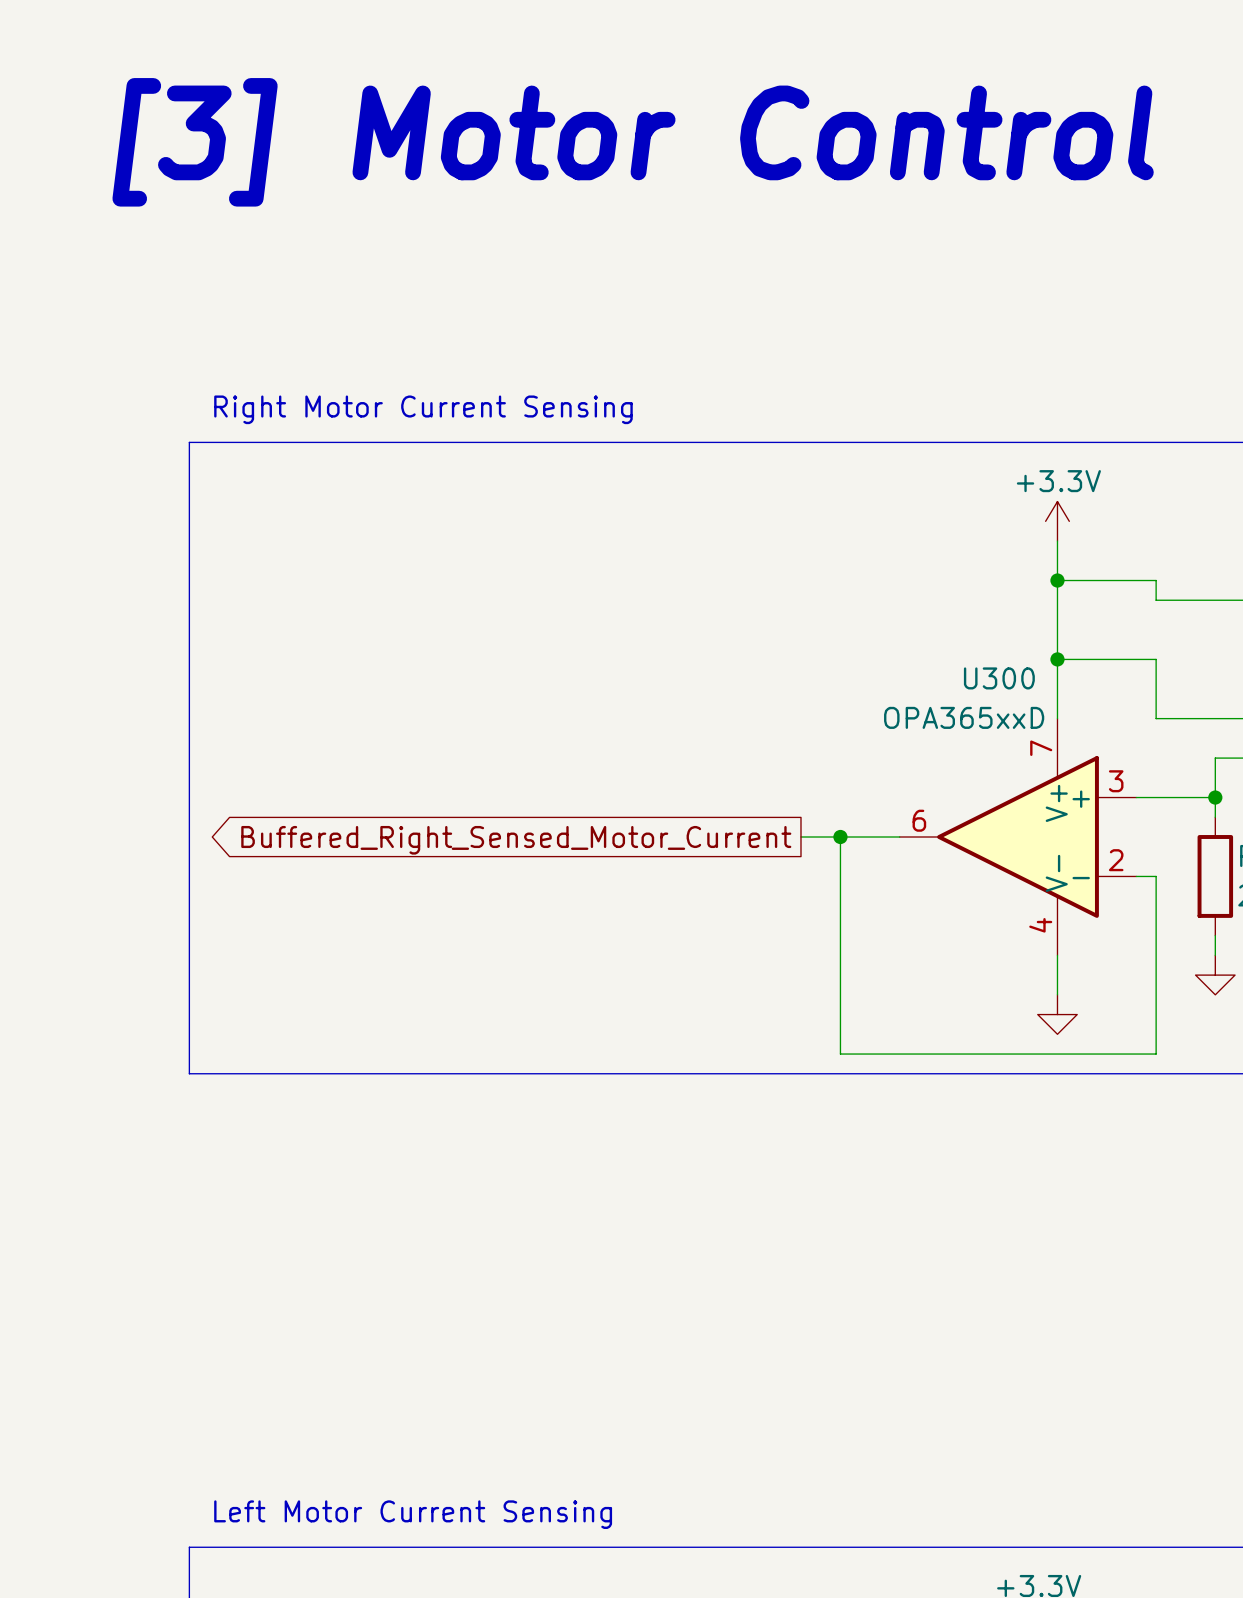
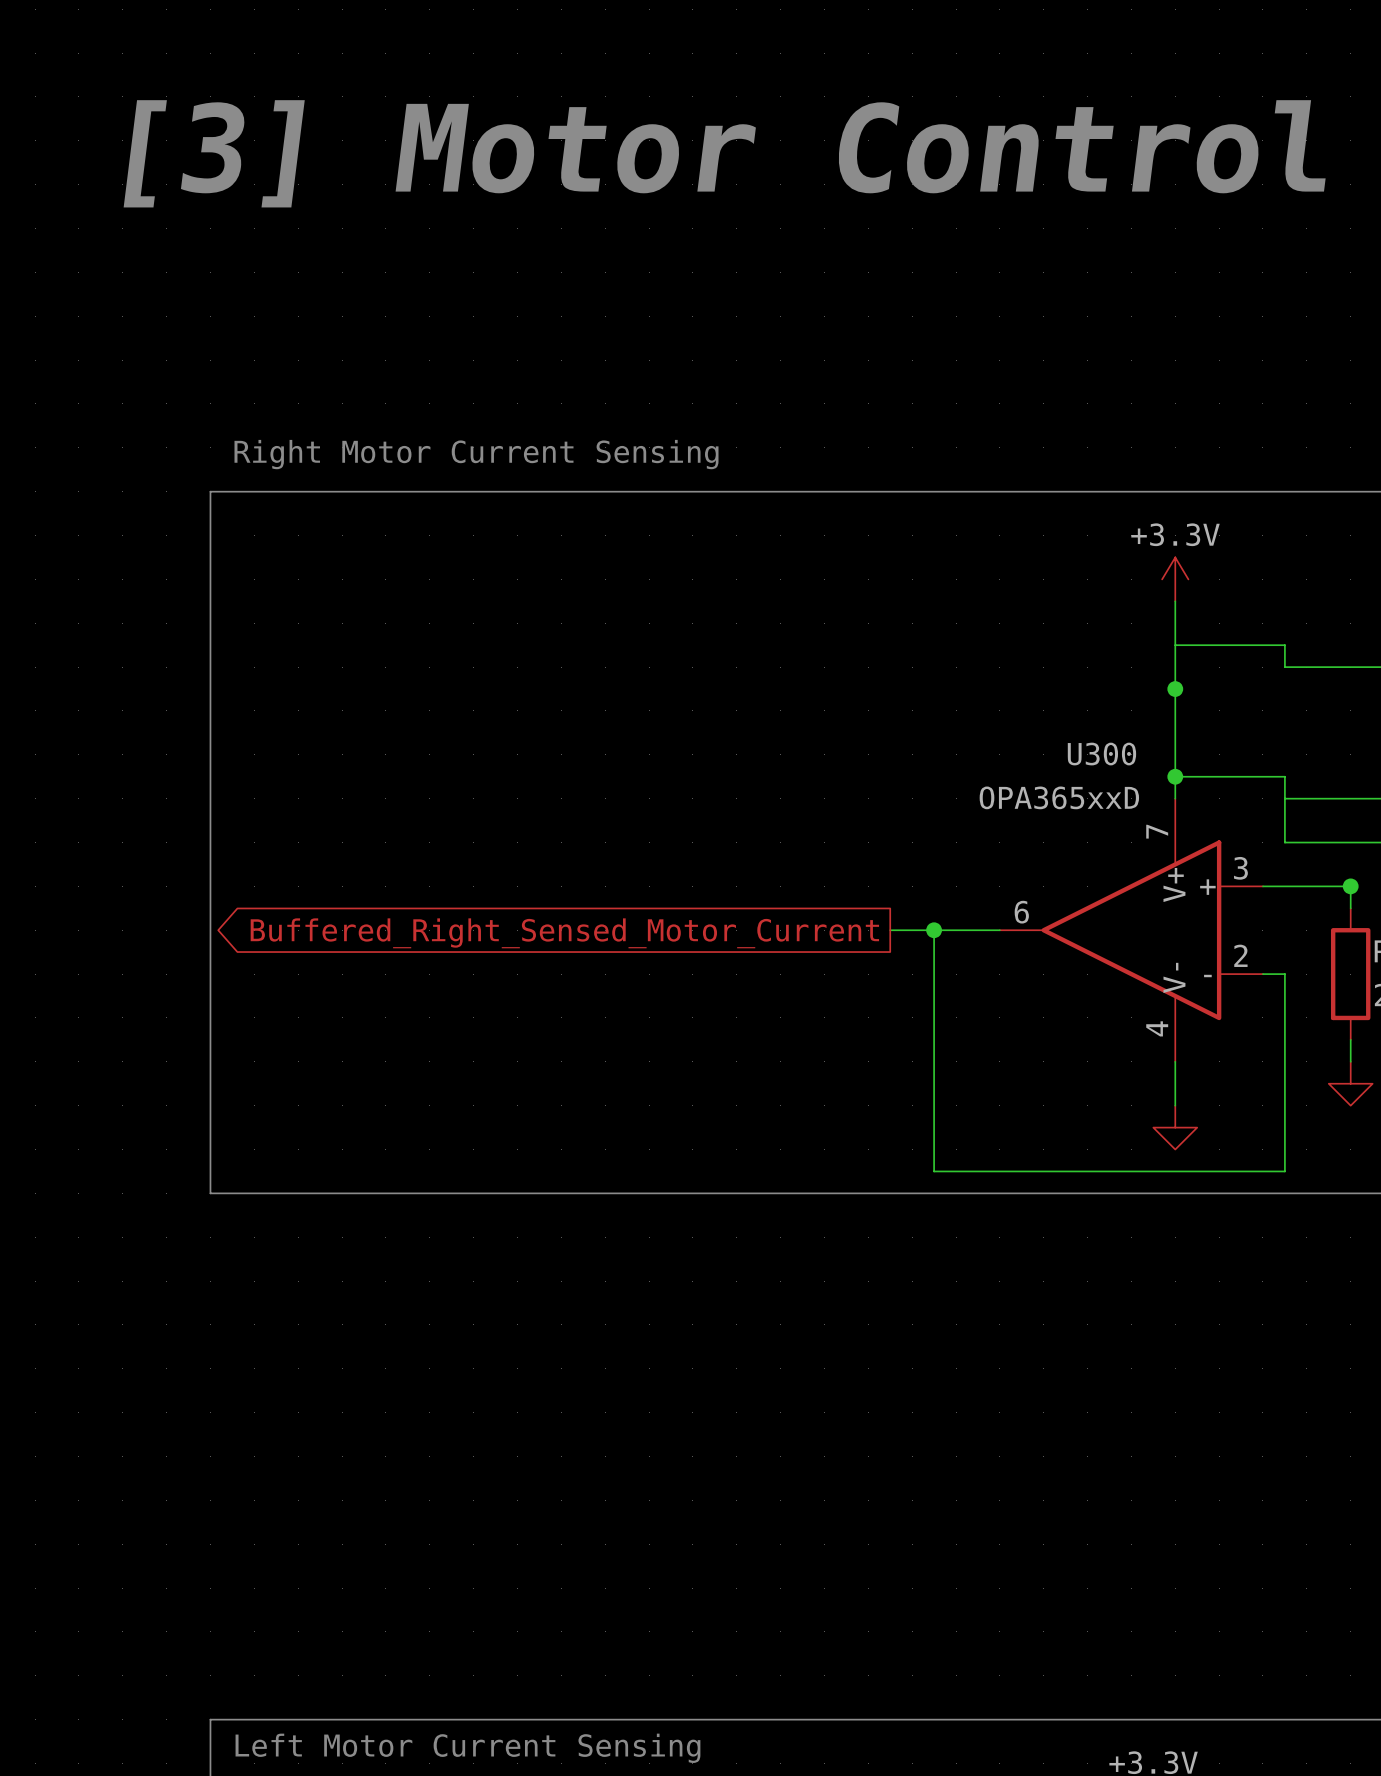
junction: (1057, 580) -> none
junction: none -> (1175, 689)
wire: (1057, 659) (1156, 659) (1156, 698) -> (1175, 776) (1284, 776)
junction: (1057, 659) -> none
junction: none -> (1175, 776)
wire: (1215, 758) (1215, 797) -> (1350, 842) (1284, 842) (1284, 798)
text position: Left Motor Current Sensing (413, 1514) -> Left Motor Current Sensing (467, 1748)

